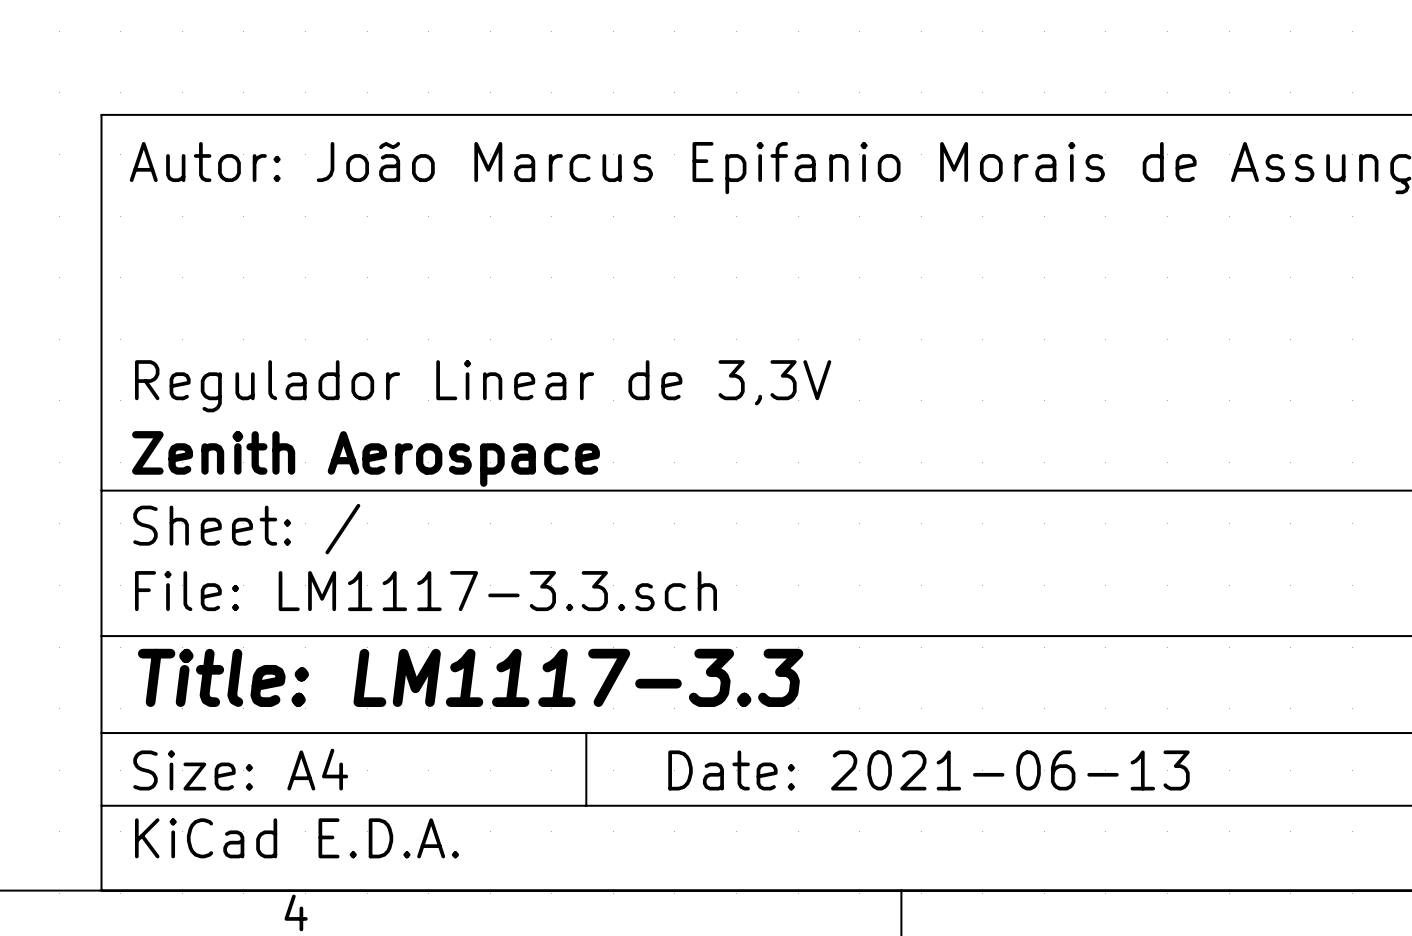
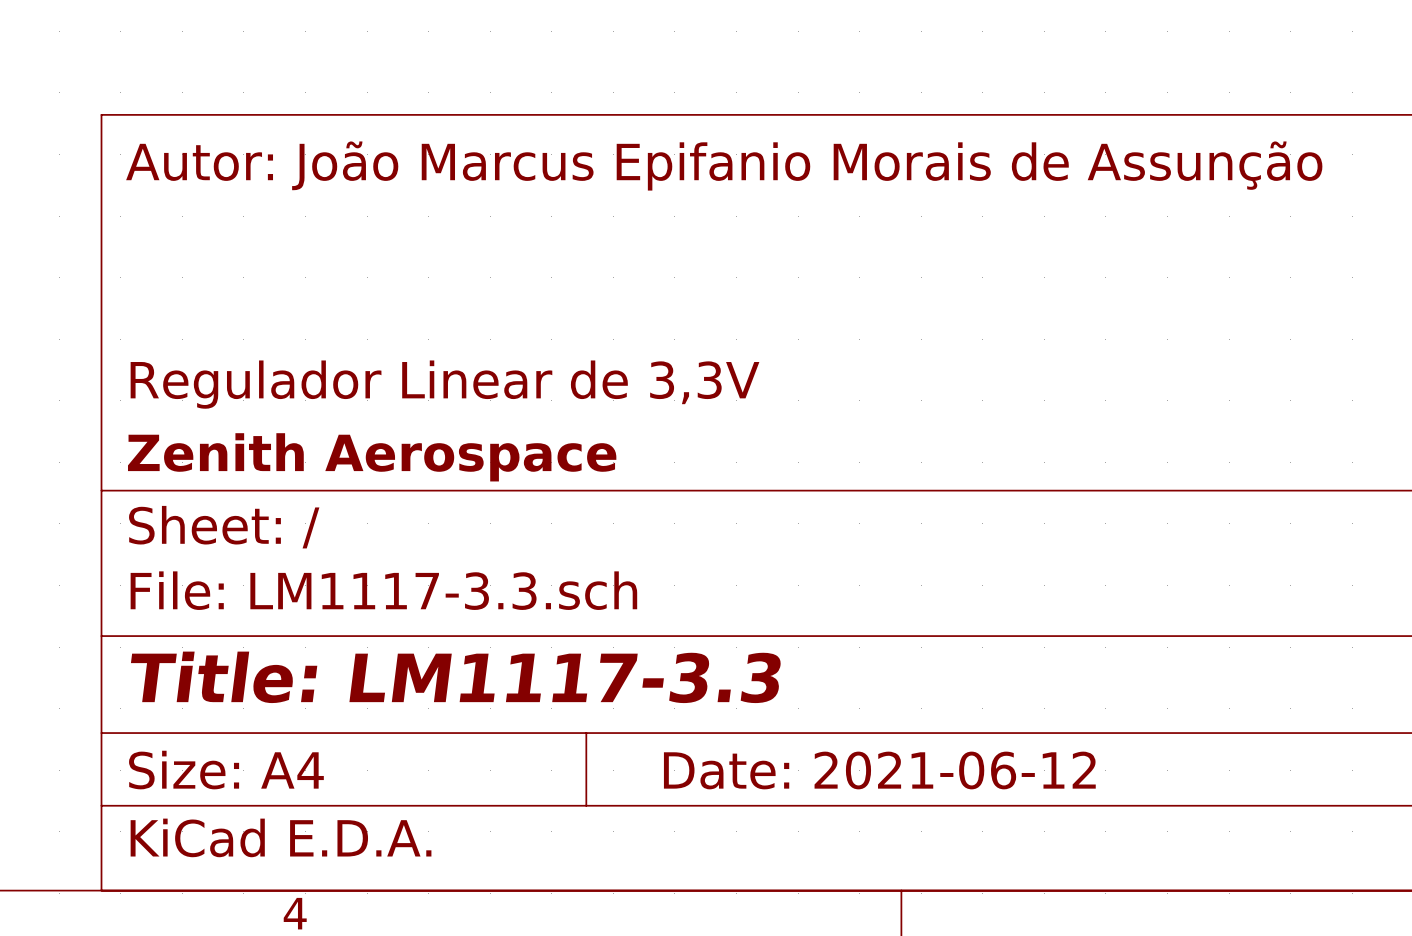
title block: Date: 2021-06-13 (928, 770) -> Date: 2021-06-12 (879, 770)

